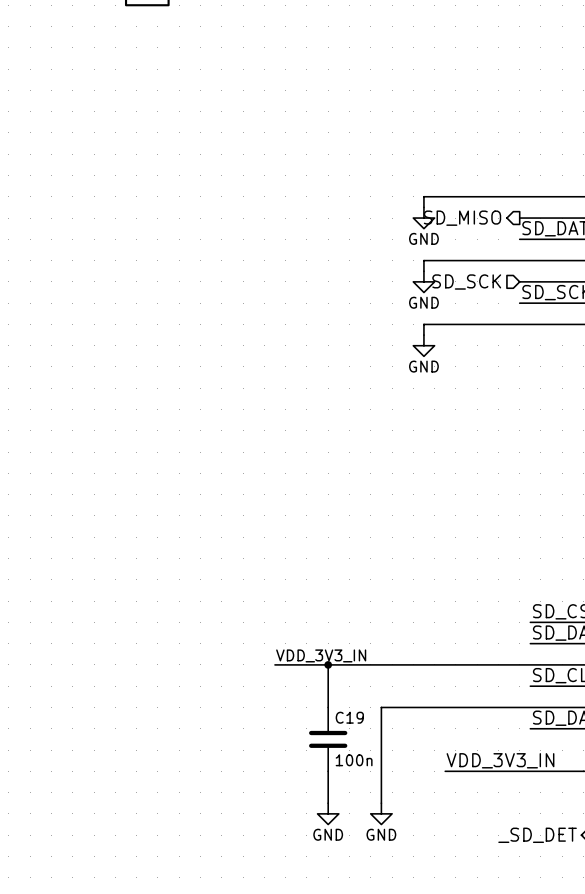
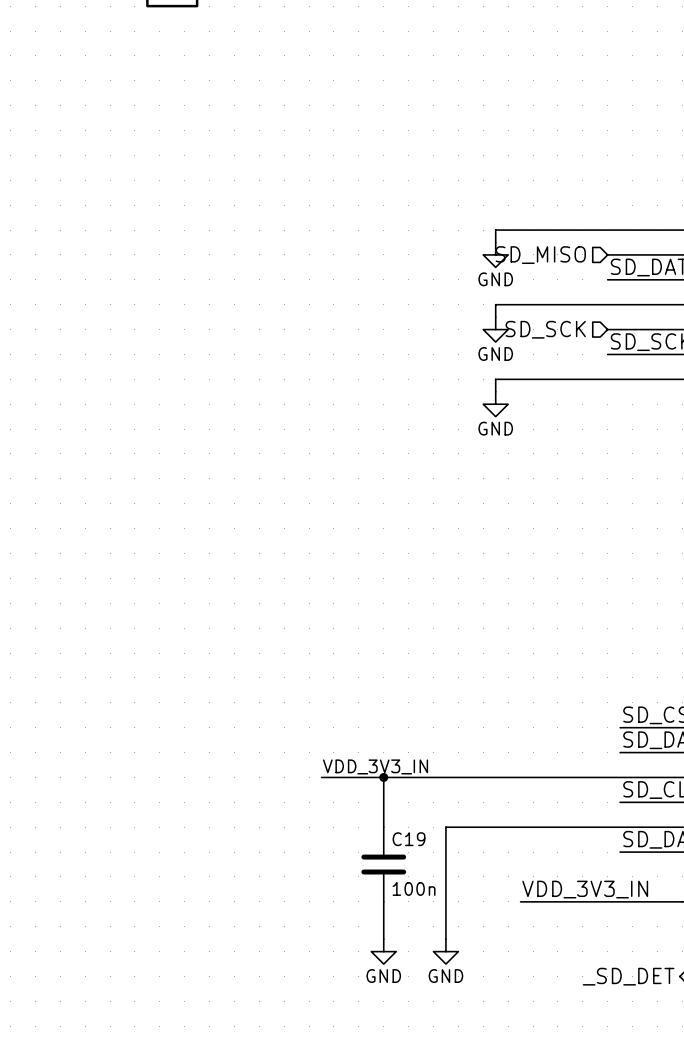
hierarchical label shape: output (462, 218) -> input (540, 255)

